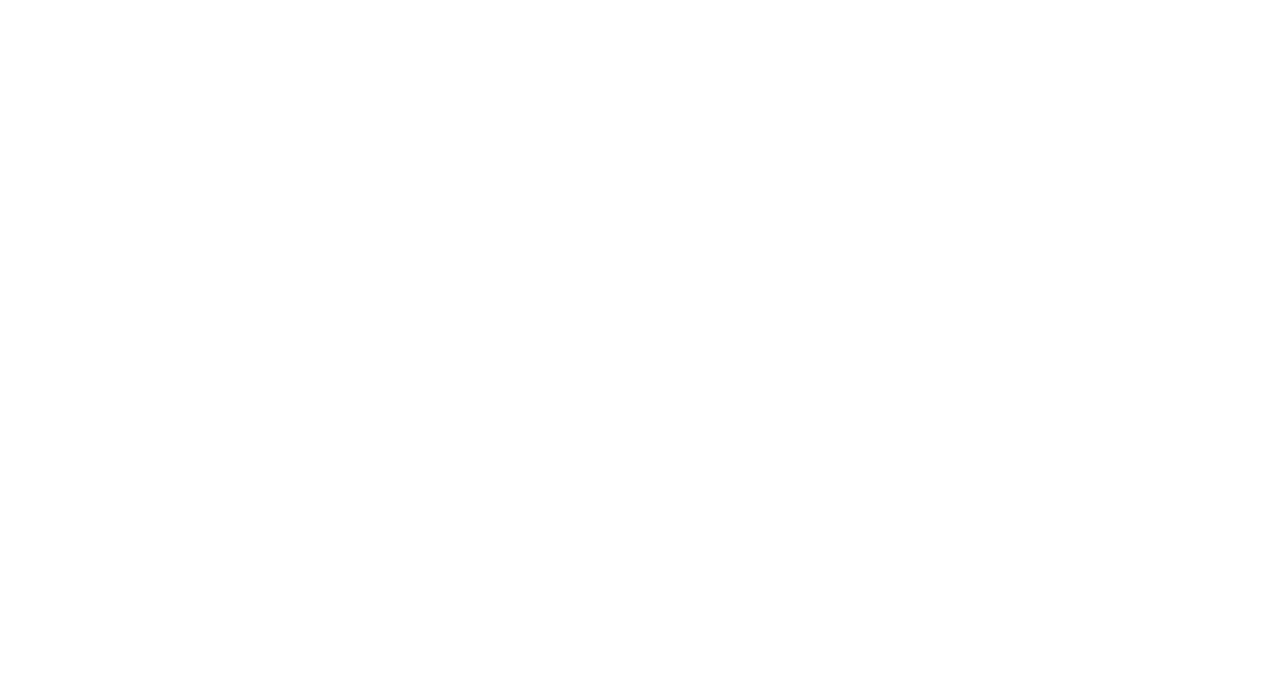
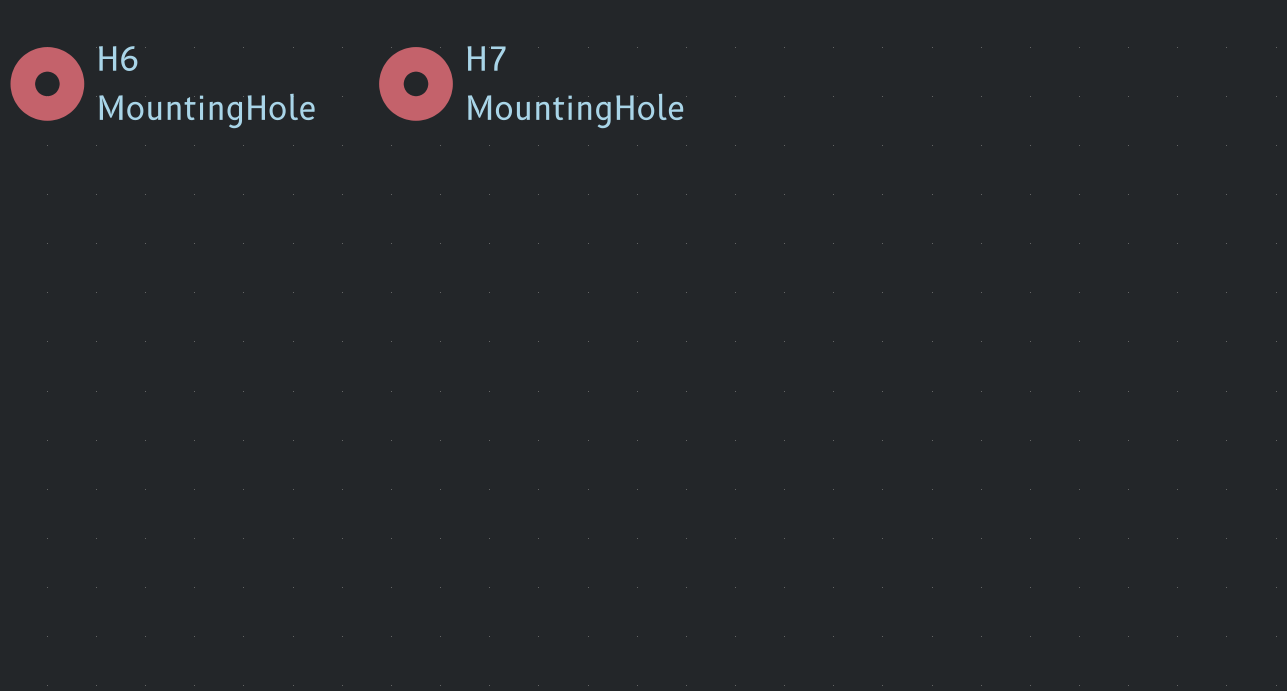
H6: none -> MountingHole (47, 83)
H7: none -> MountingHole (415, 83)

